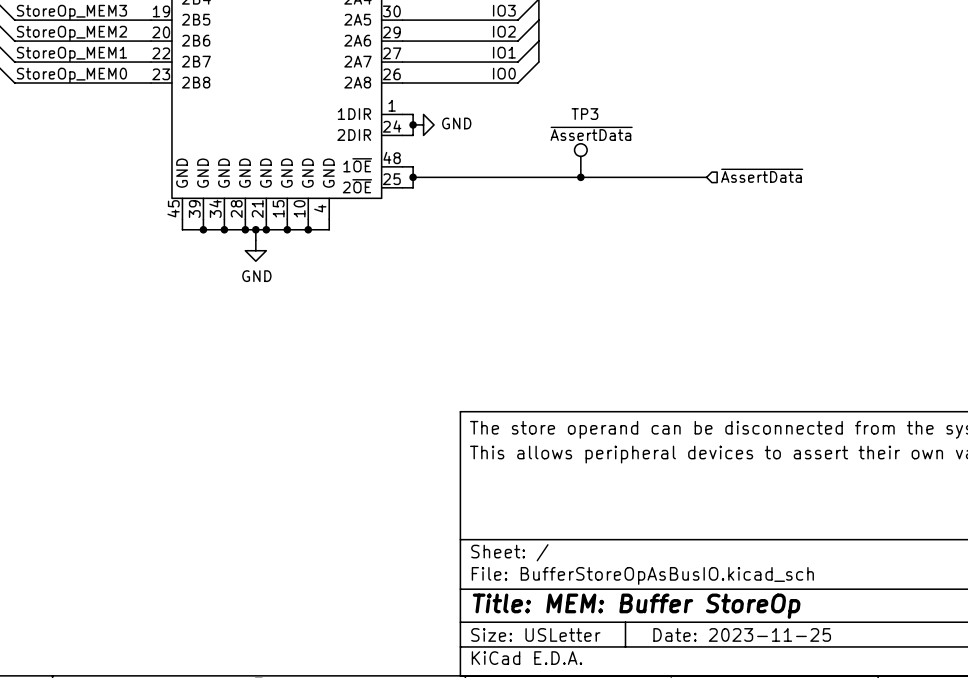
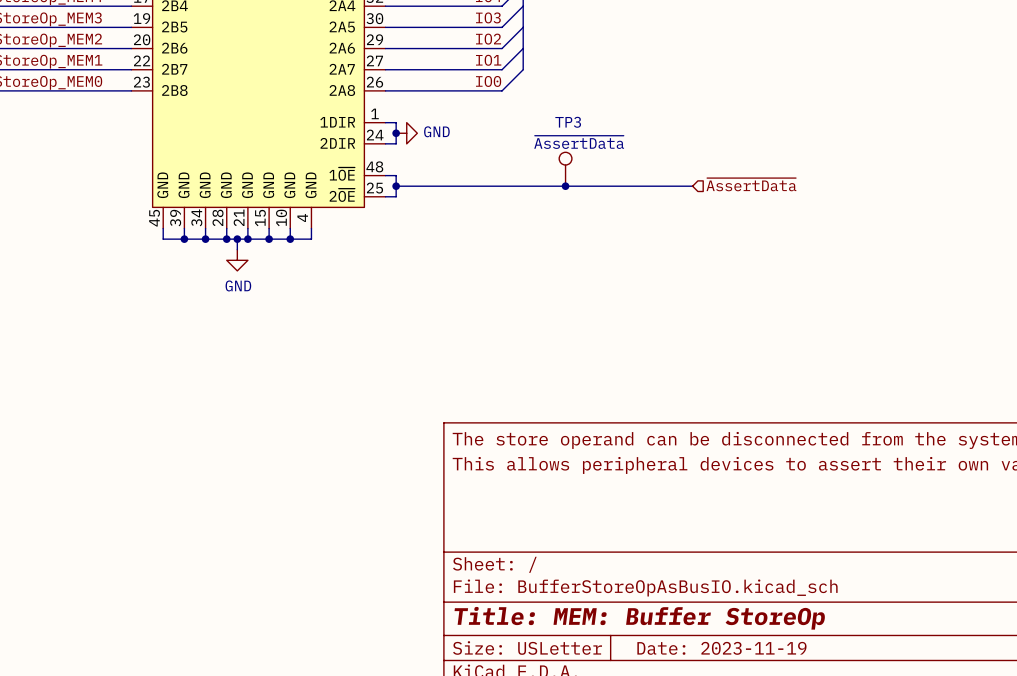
title block: Date: 2023-11-25 (742, 634) -> Date: 2023-11-19 (721, 648)

